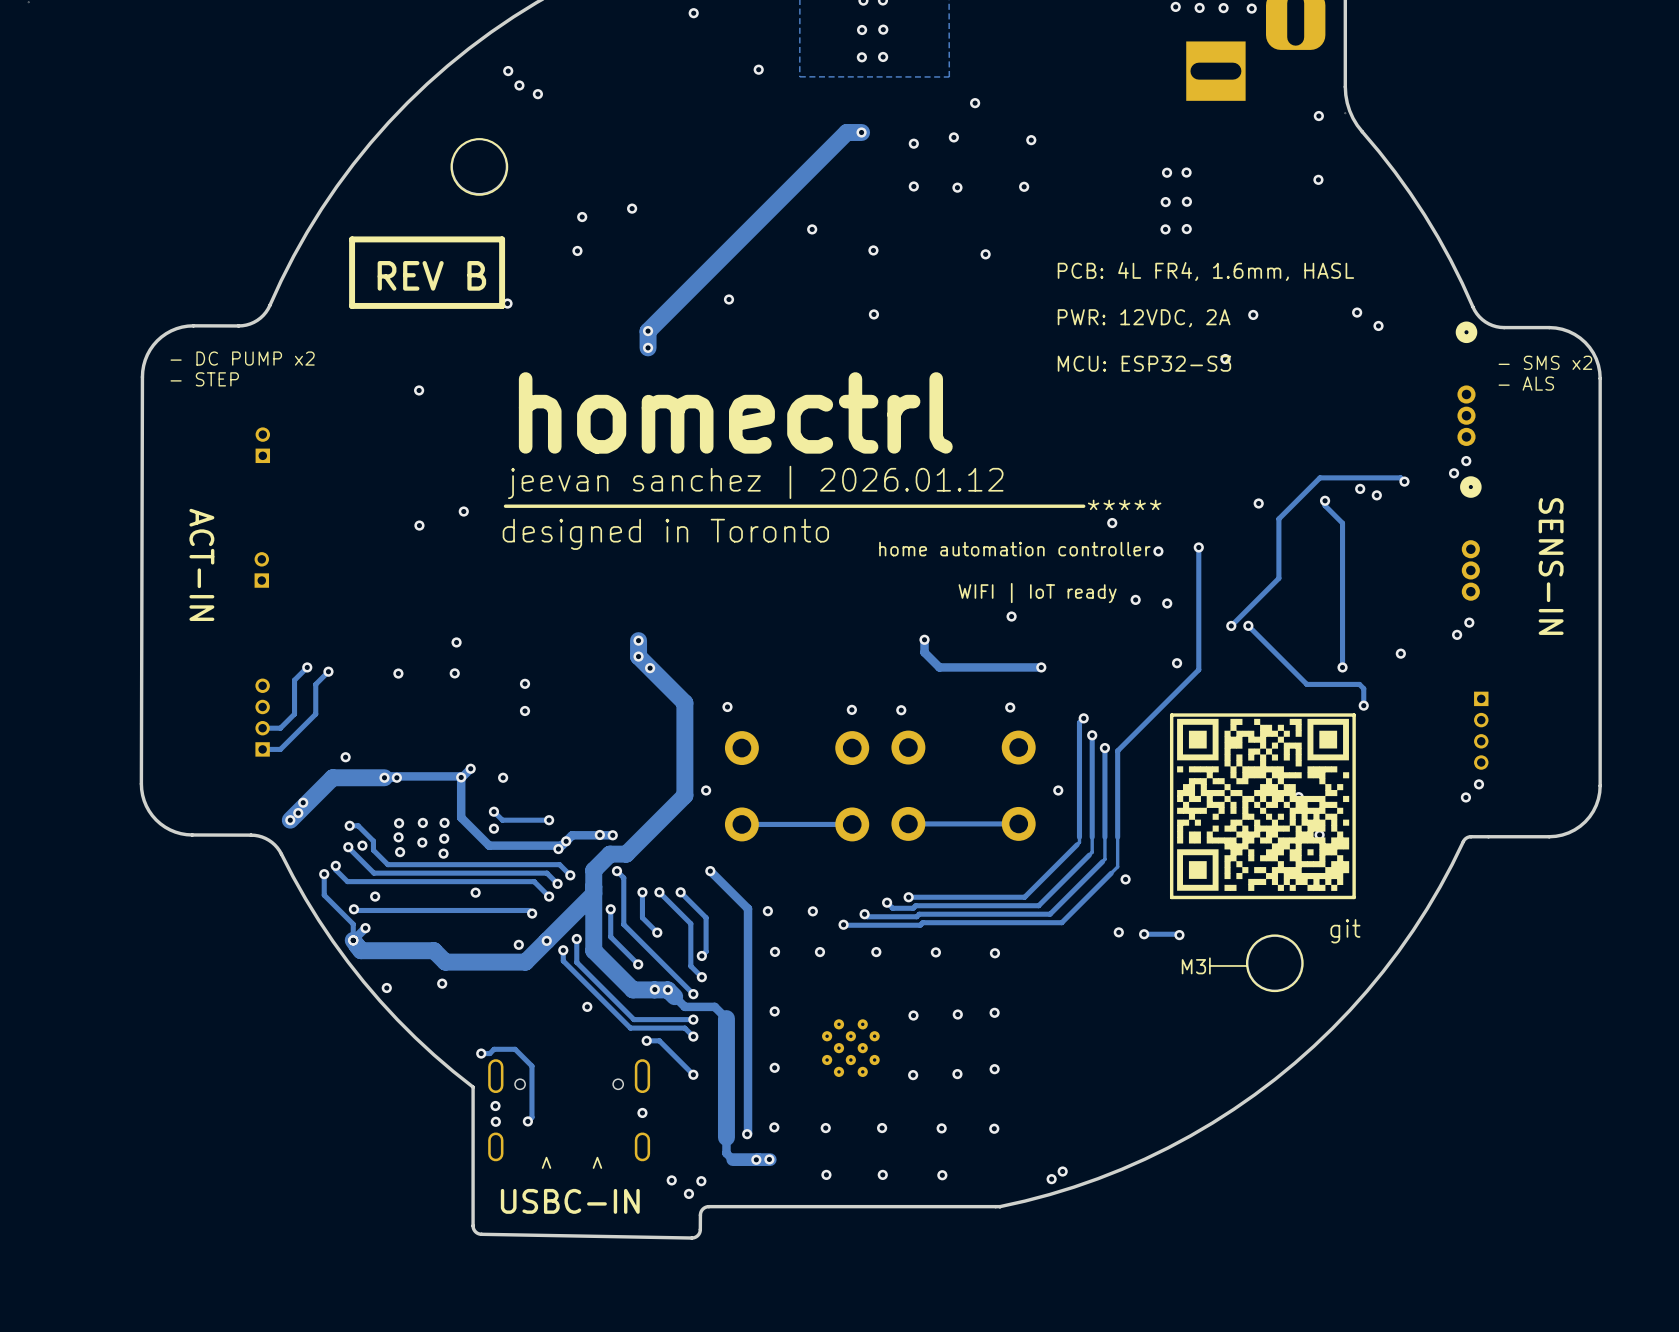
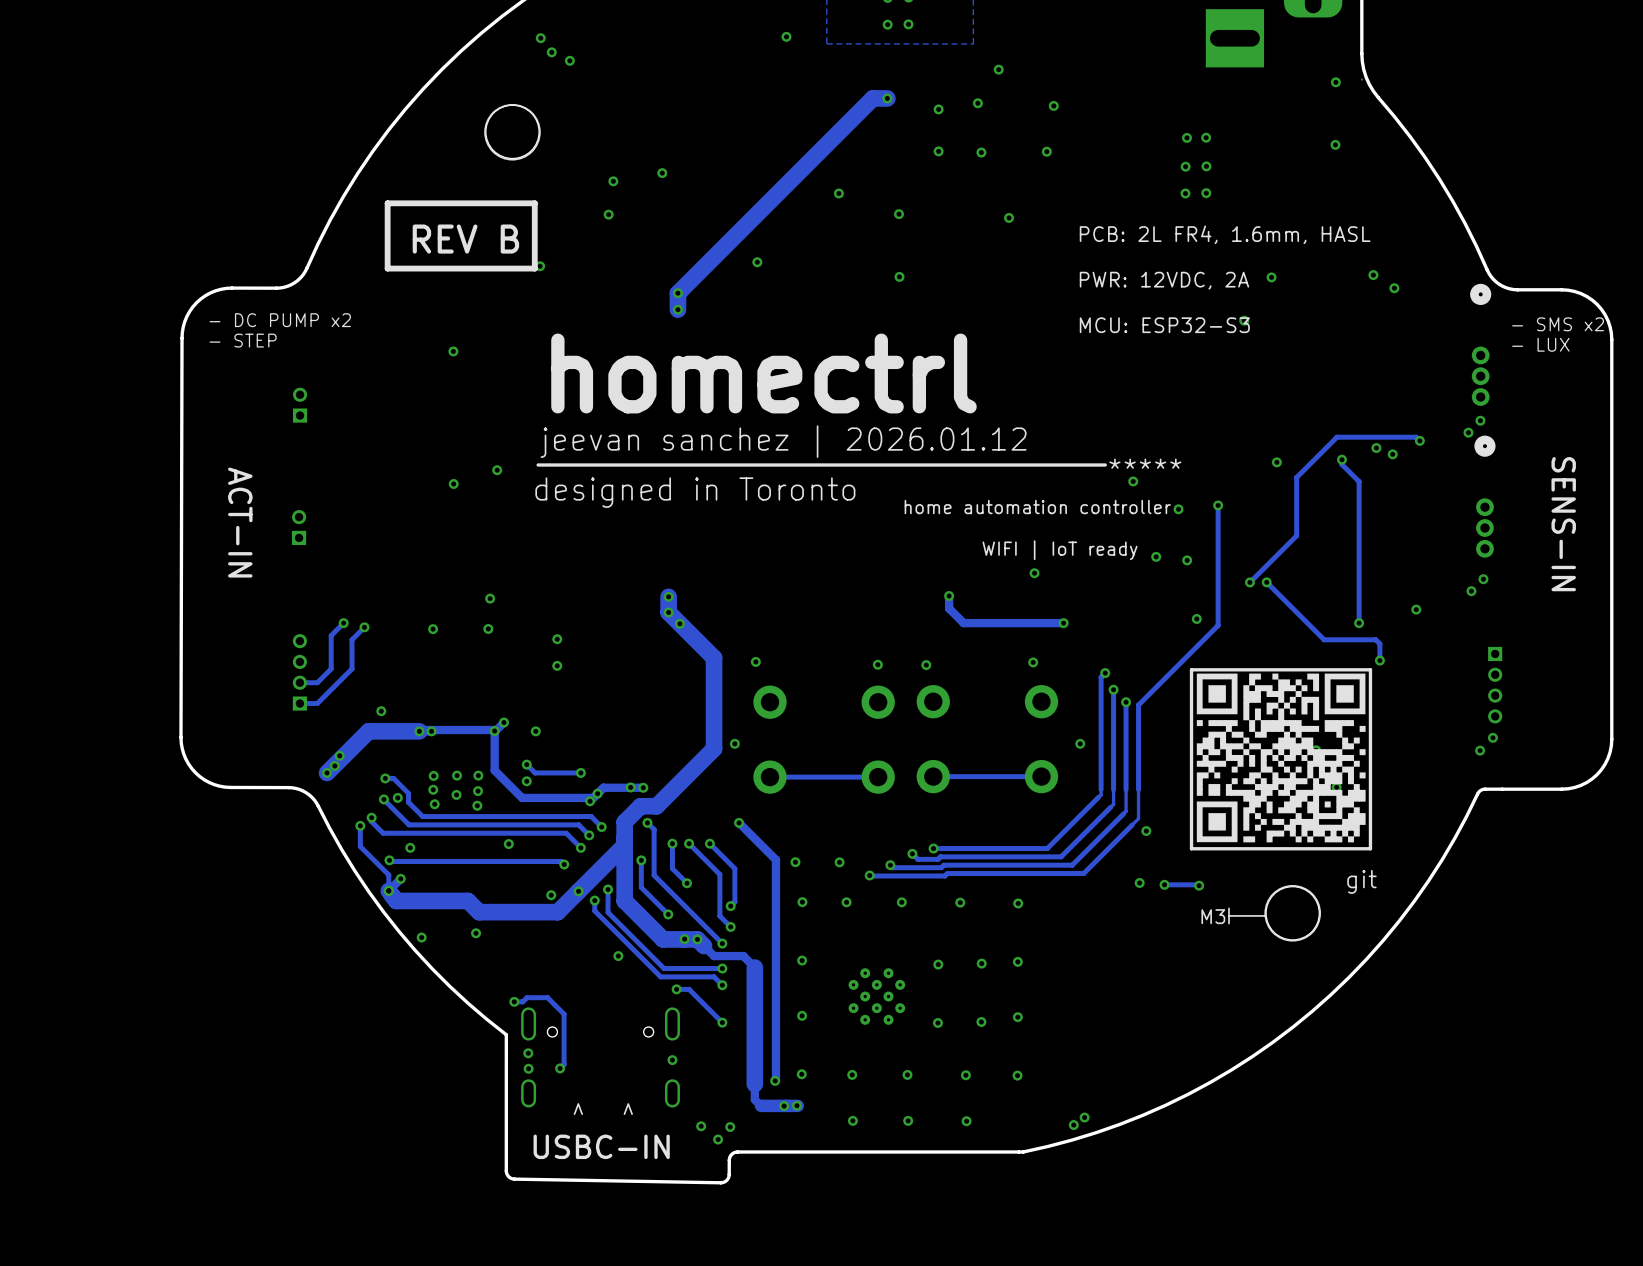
text: PCB: 4L FR4, 1.6mm, HASL (1205, 271) -> PCB: 2L FR4, 1.6mm, HASL (1225, 234)
text: - ALS (1526, 383) -> - LUX (1540, 344)

